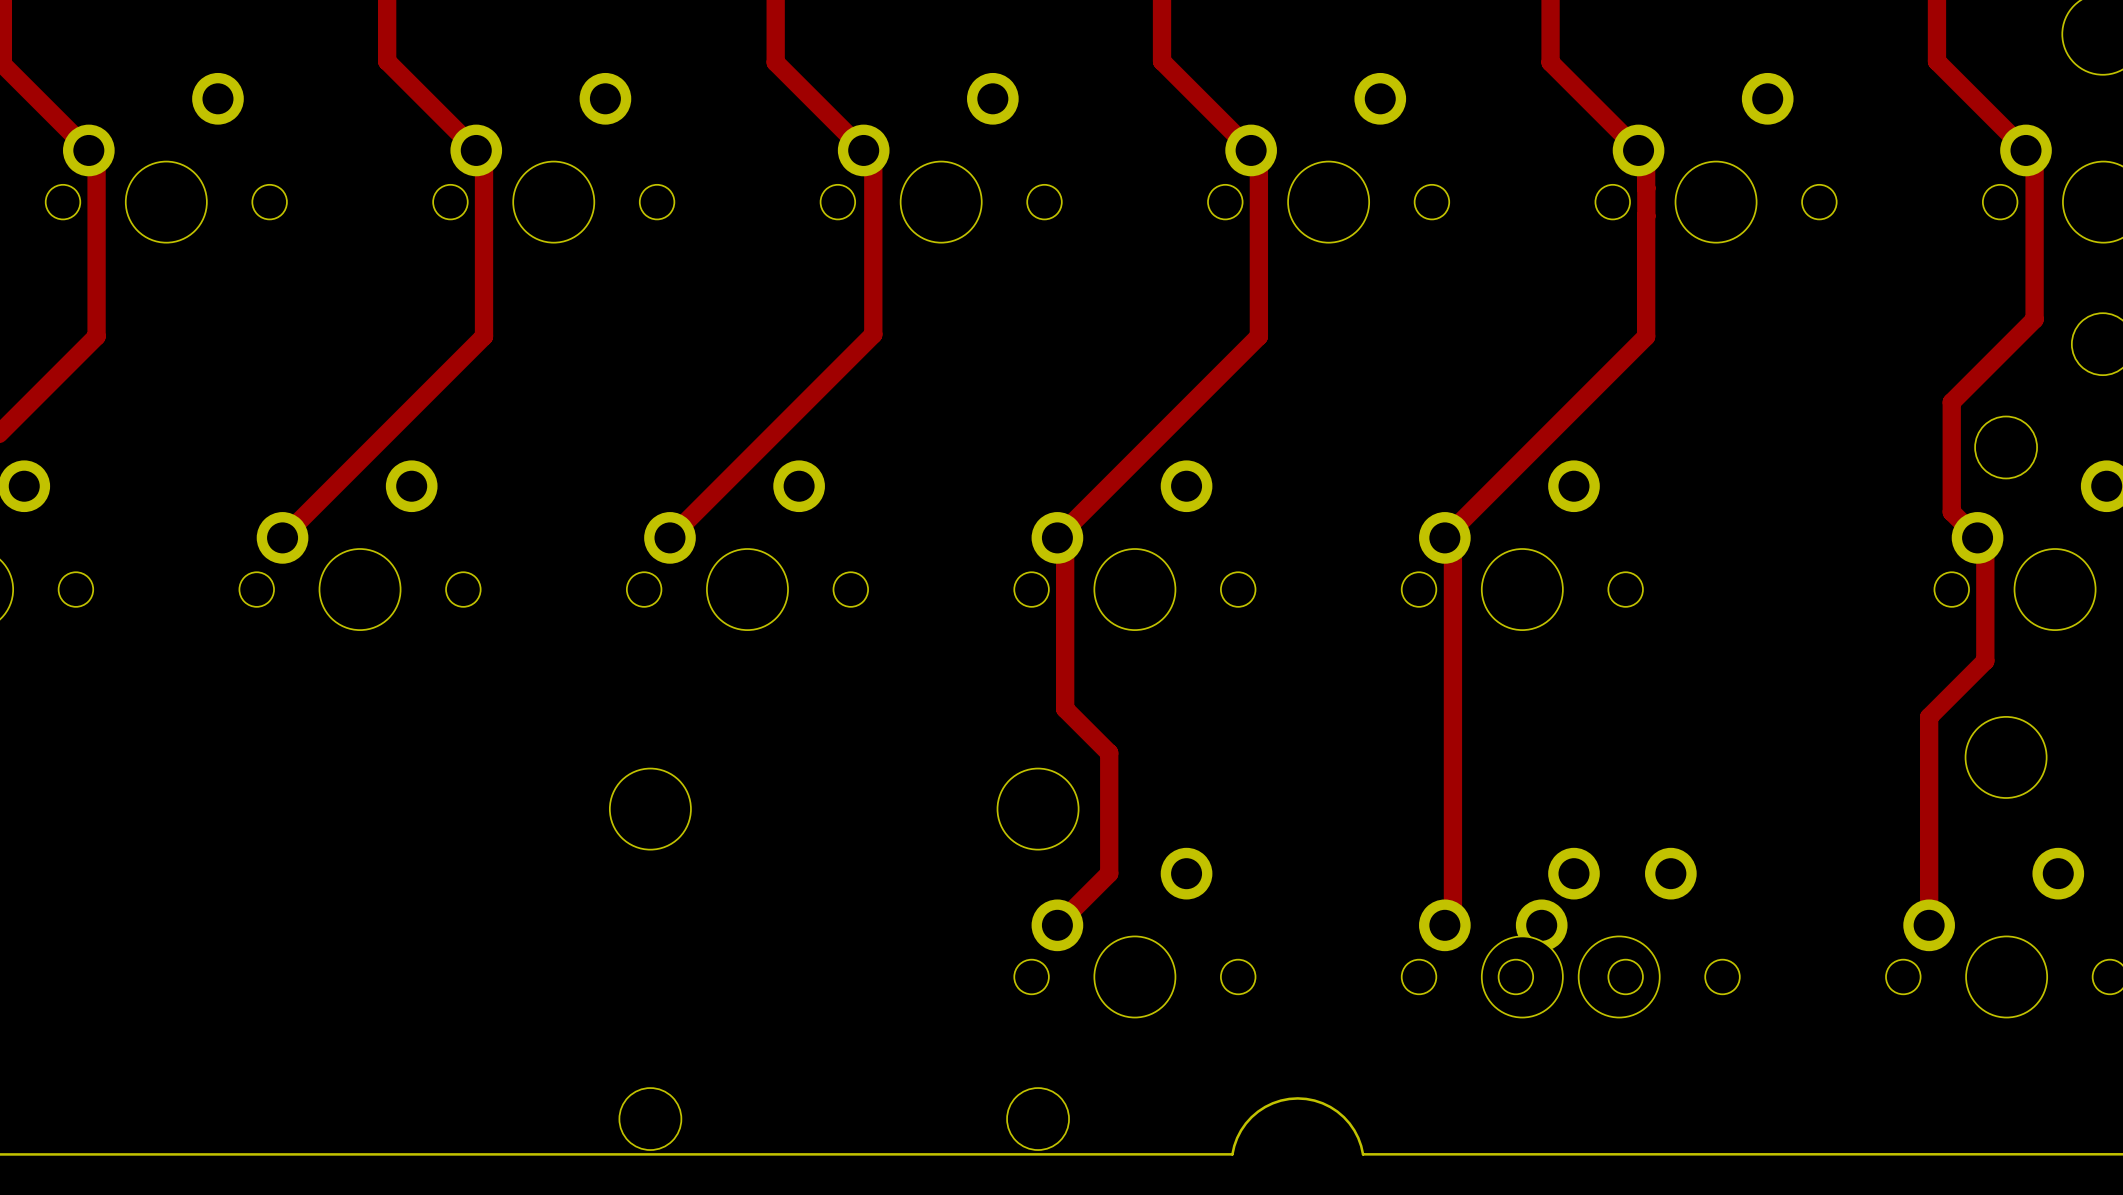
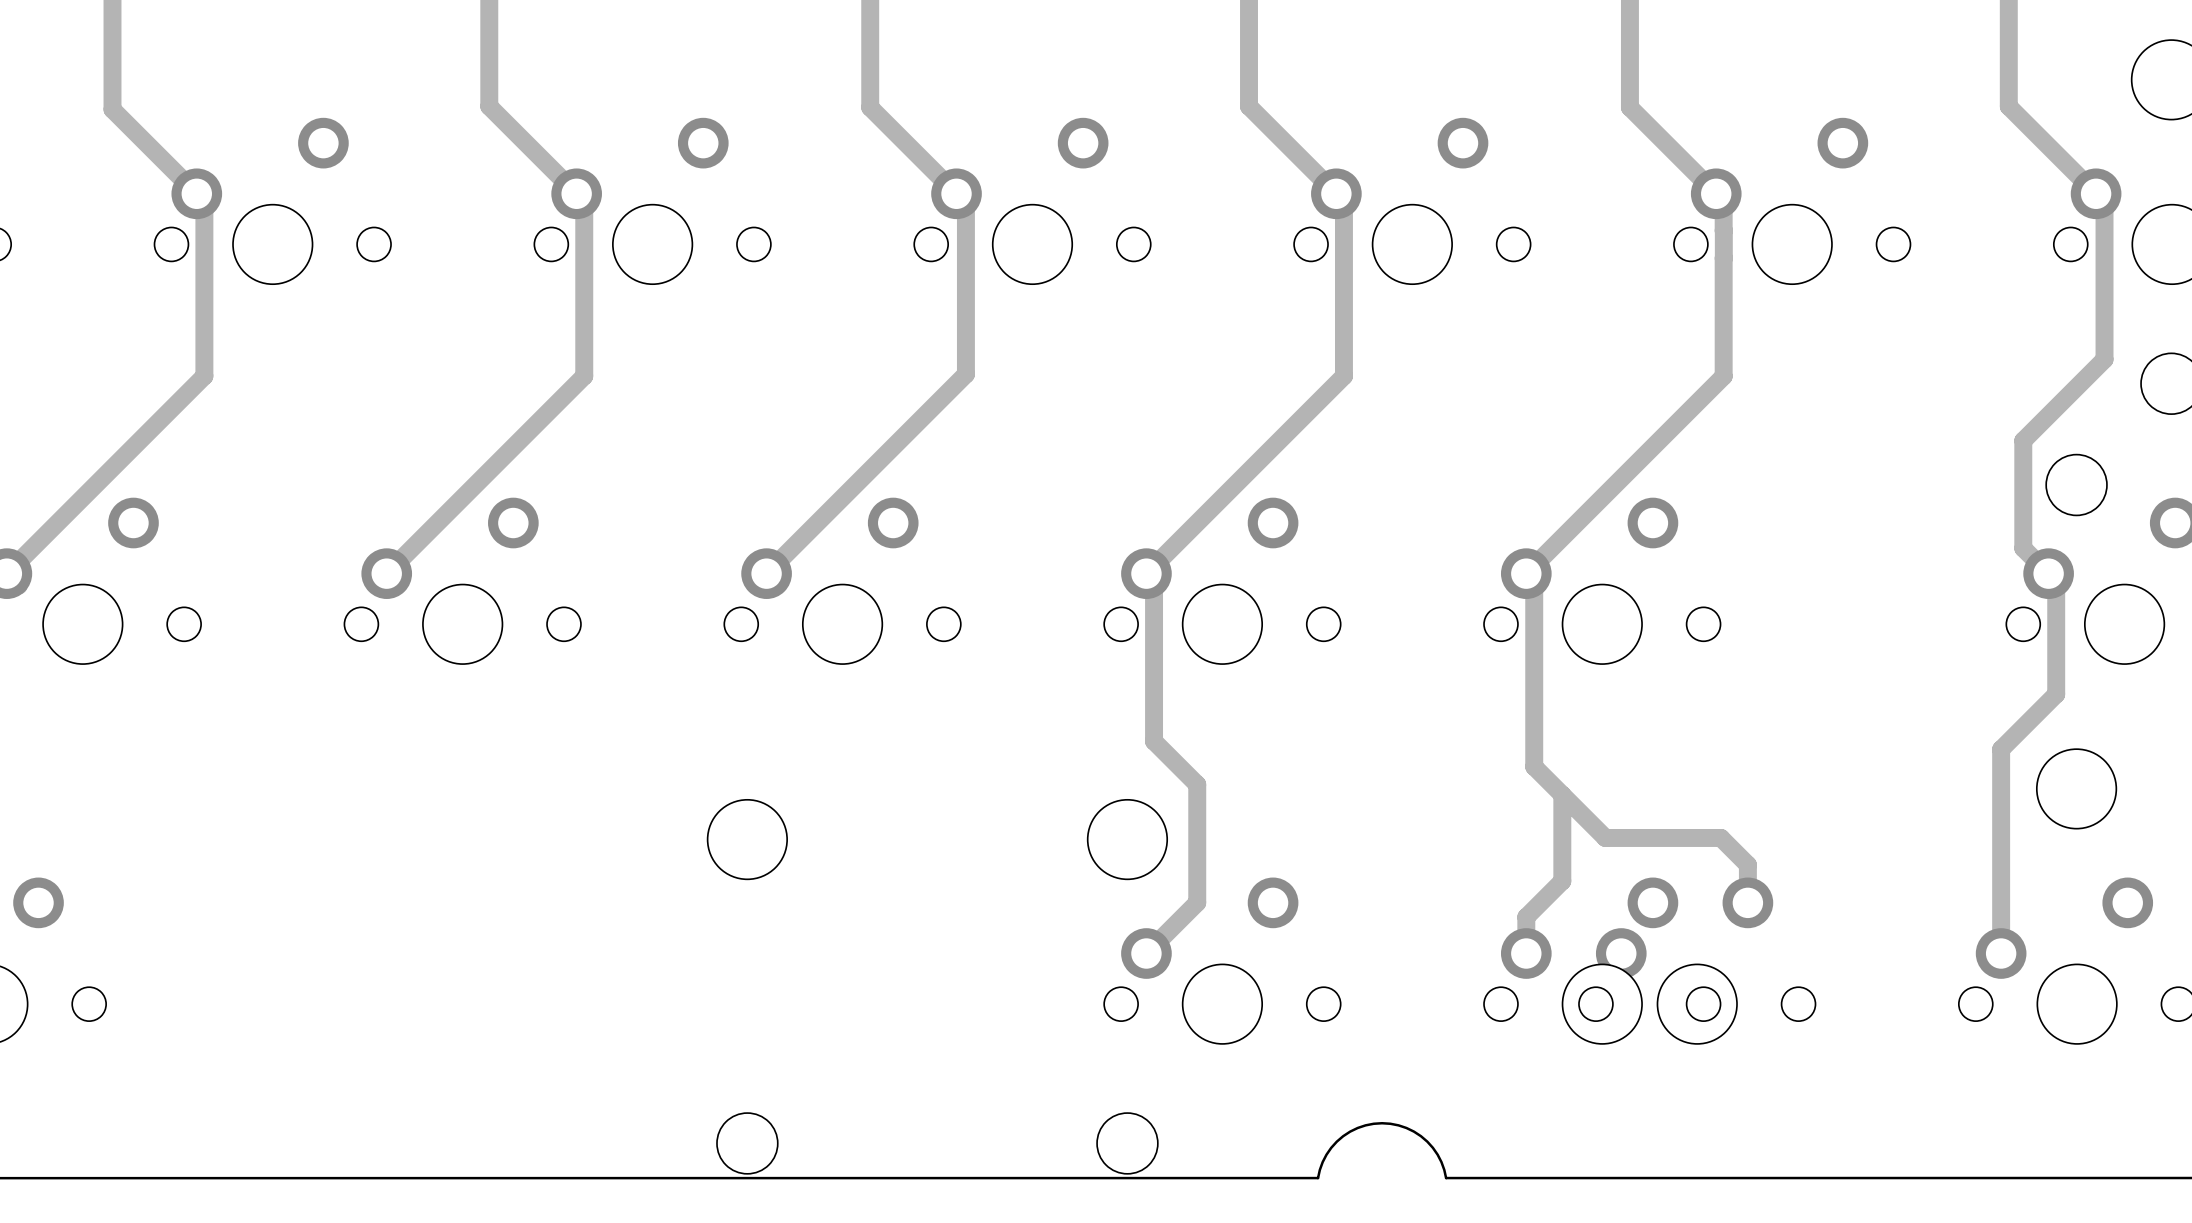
track: (1452, 734) (1452, 917) -> (1534, 766) (1605, 837) (1720, 837) (1747, 864) (1747, 902)
track: none -> (1562, 794) (1562, 881) (1526, 917) (1526, 953)

